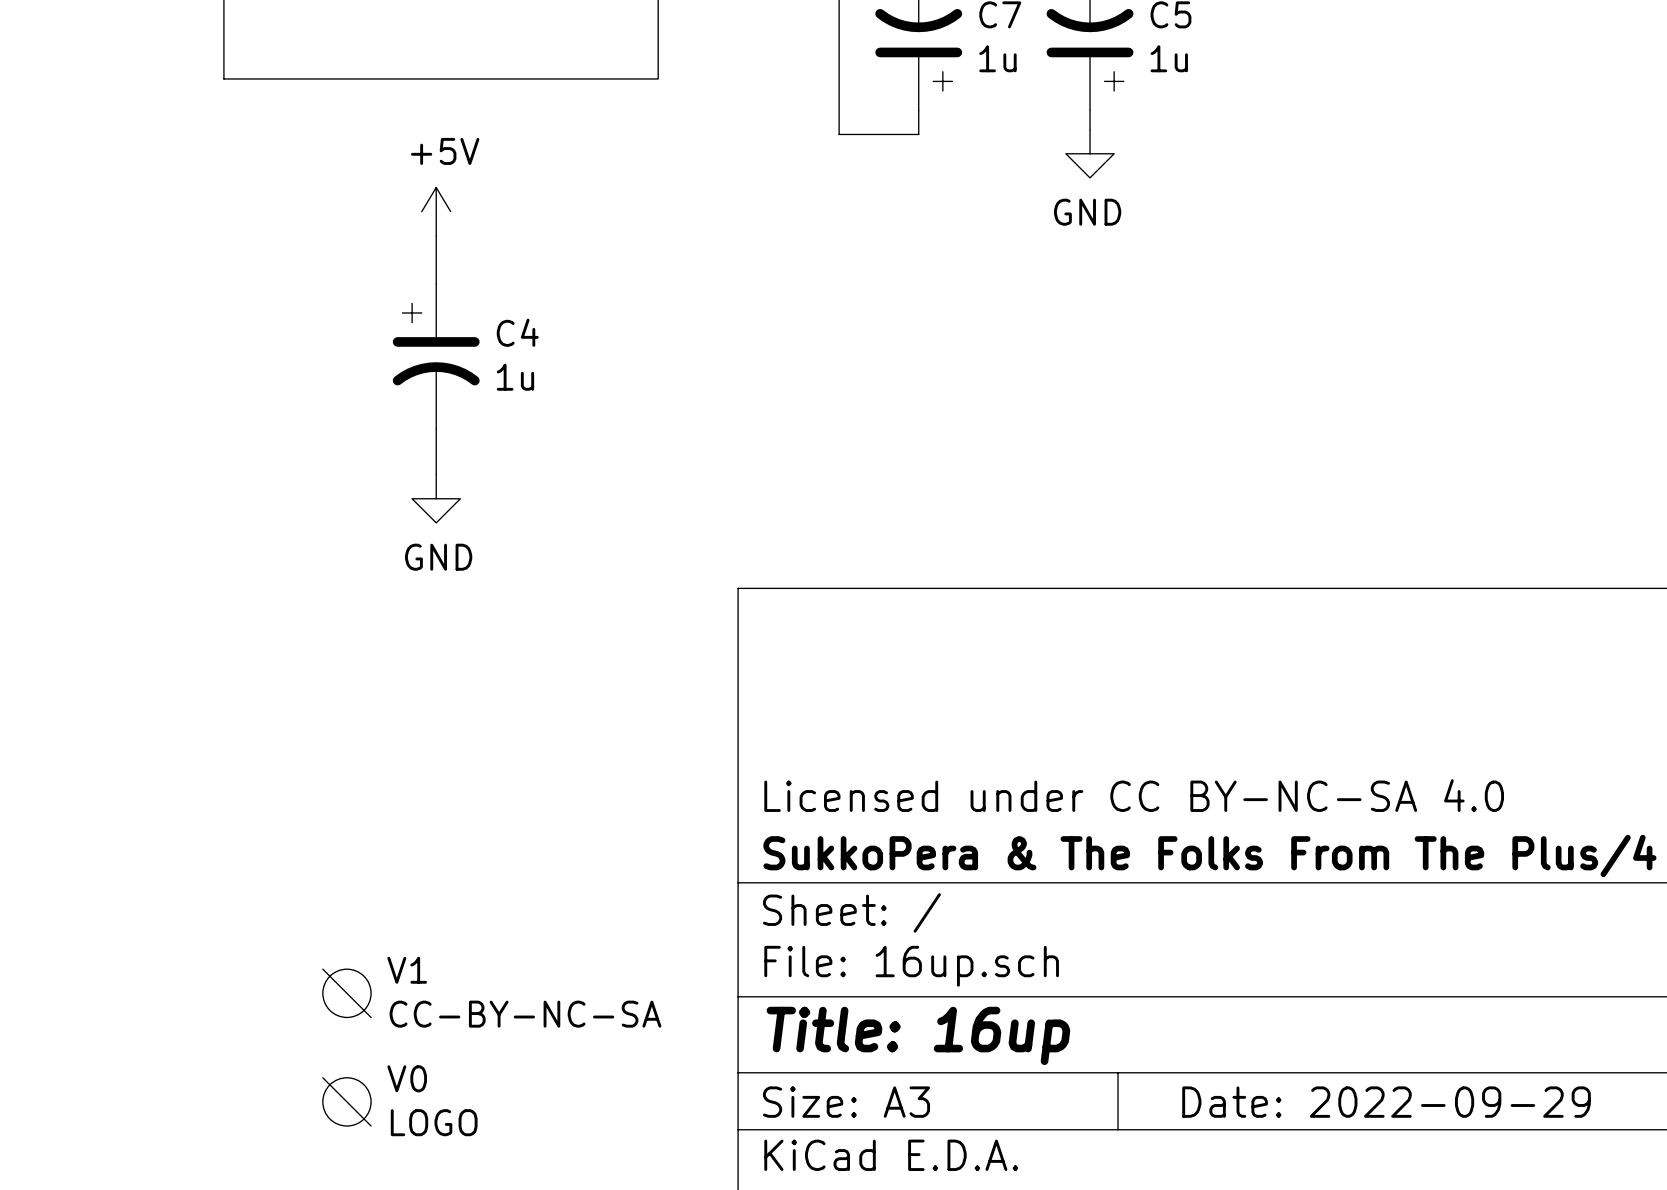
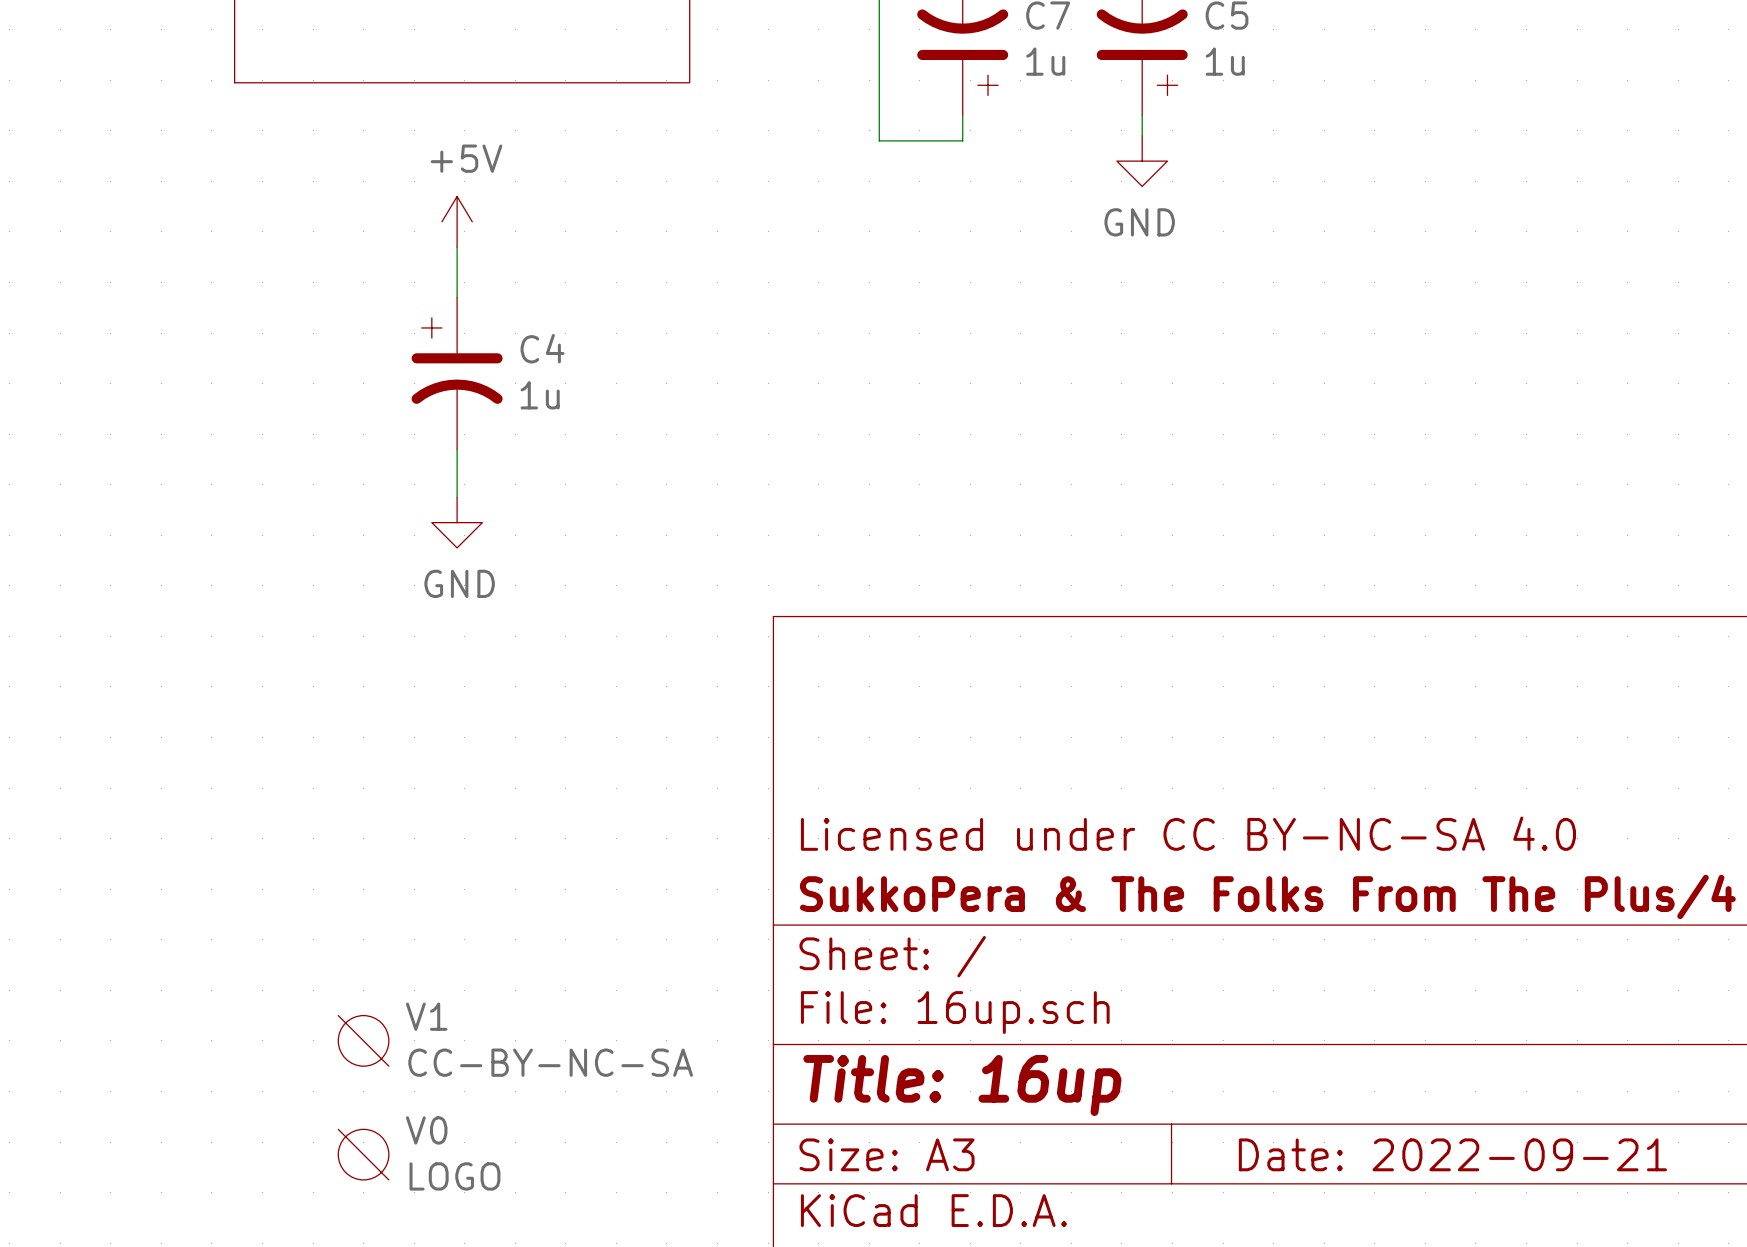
title block: Date: 2022-09-29 (1386, 1102) -> Date: 2022-09-21 (1452, 1154)

